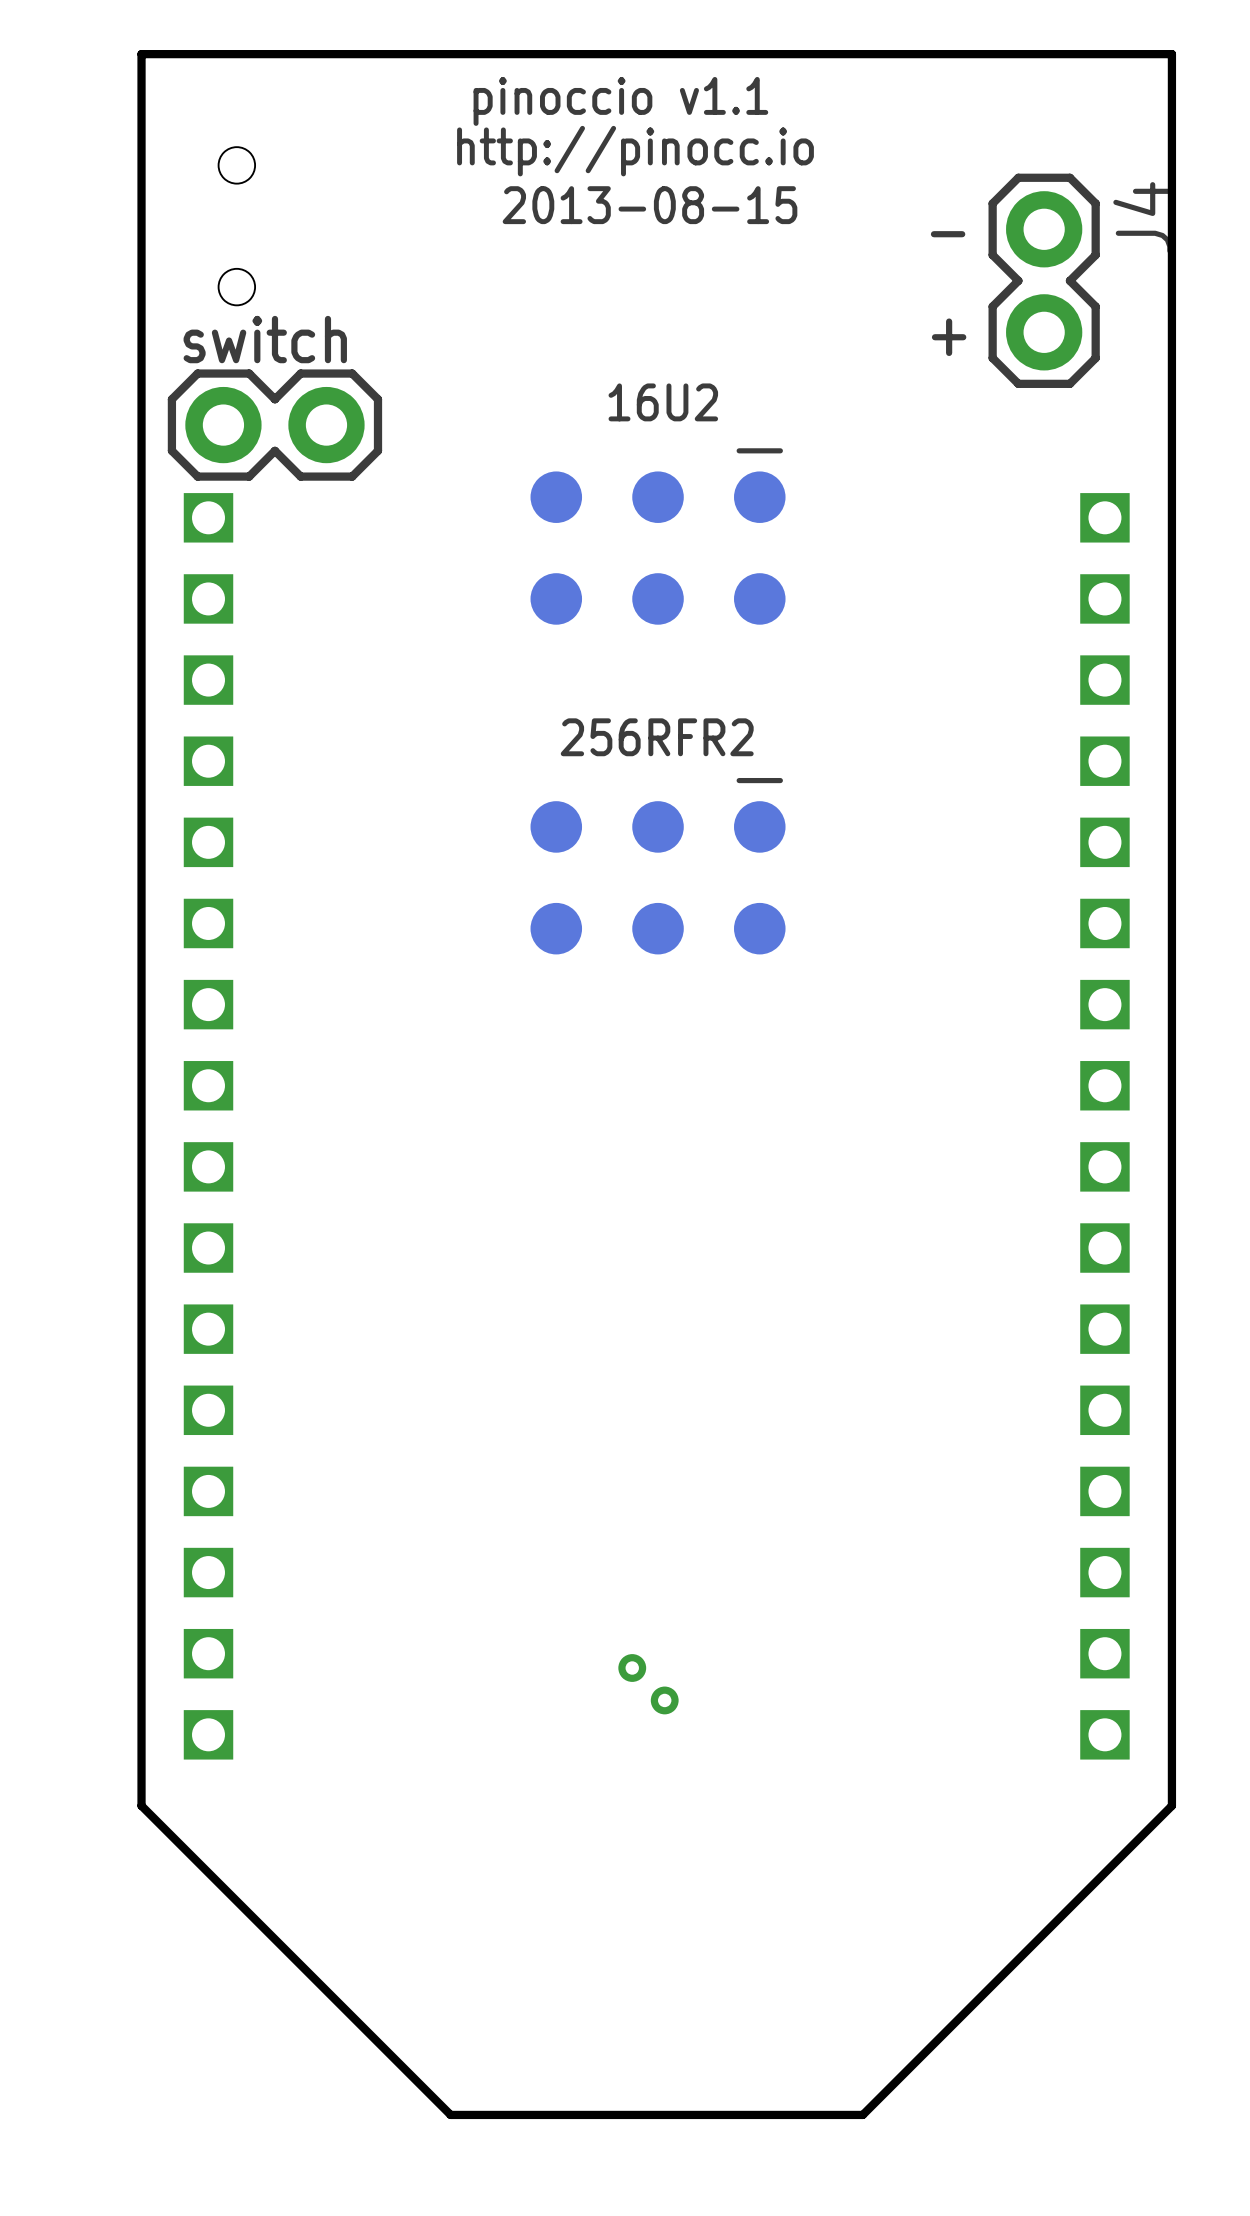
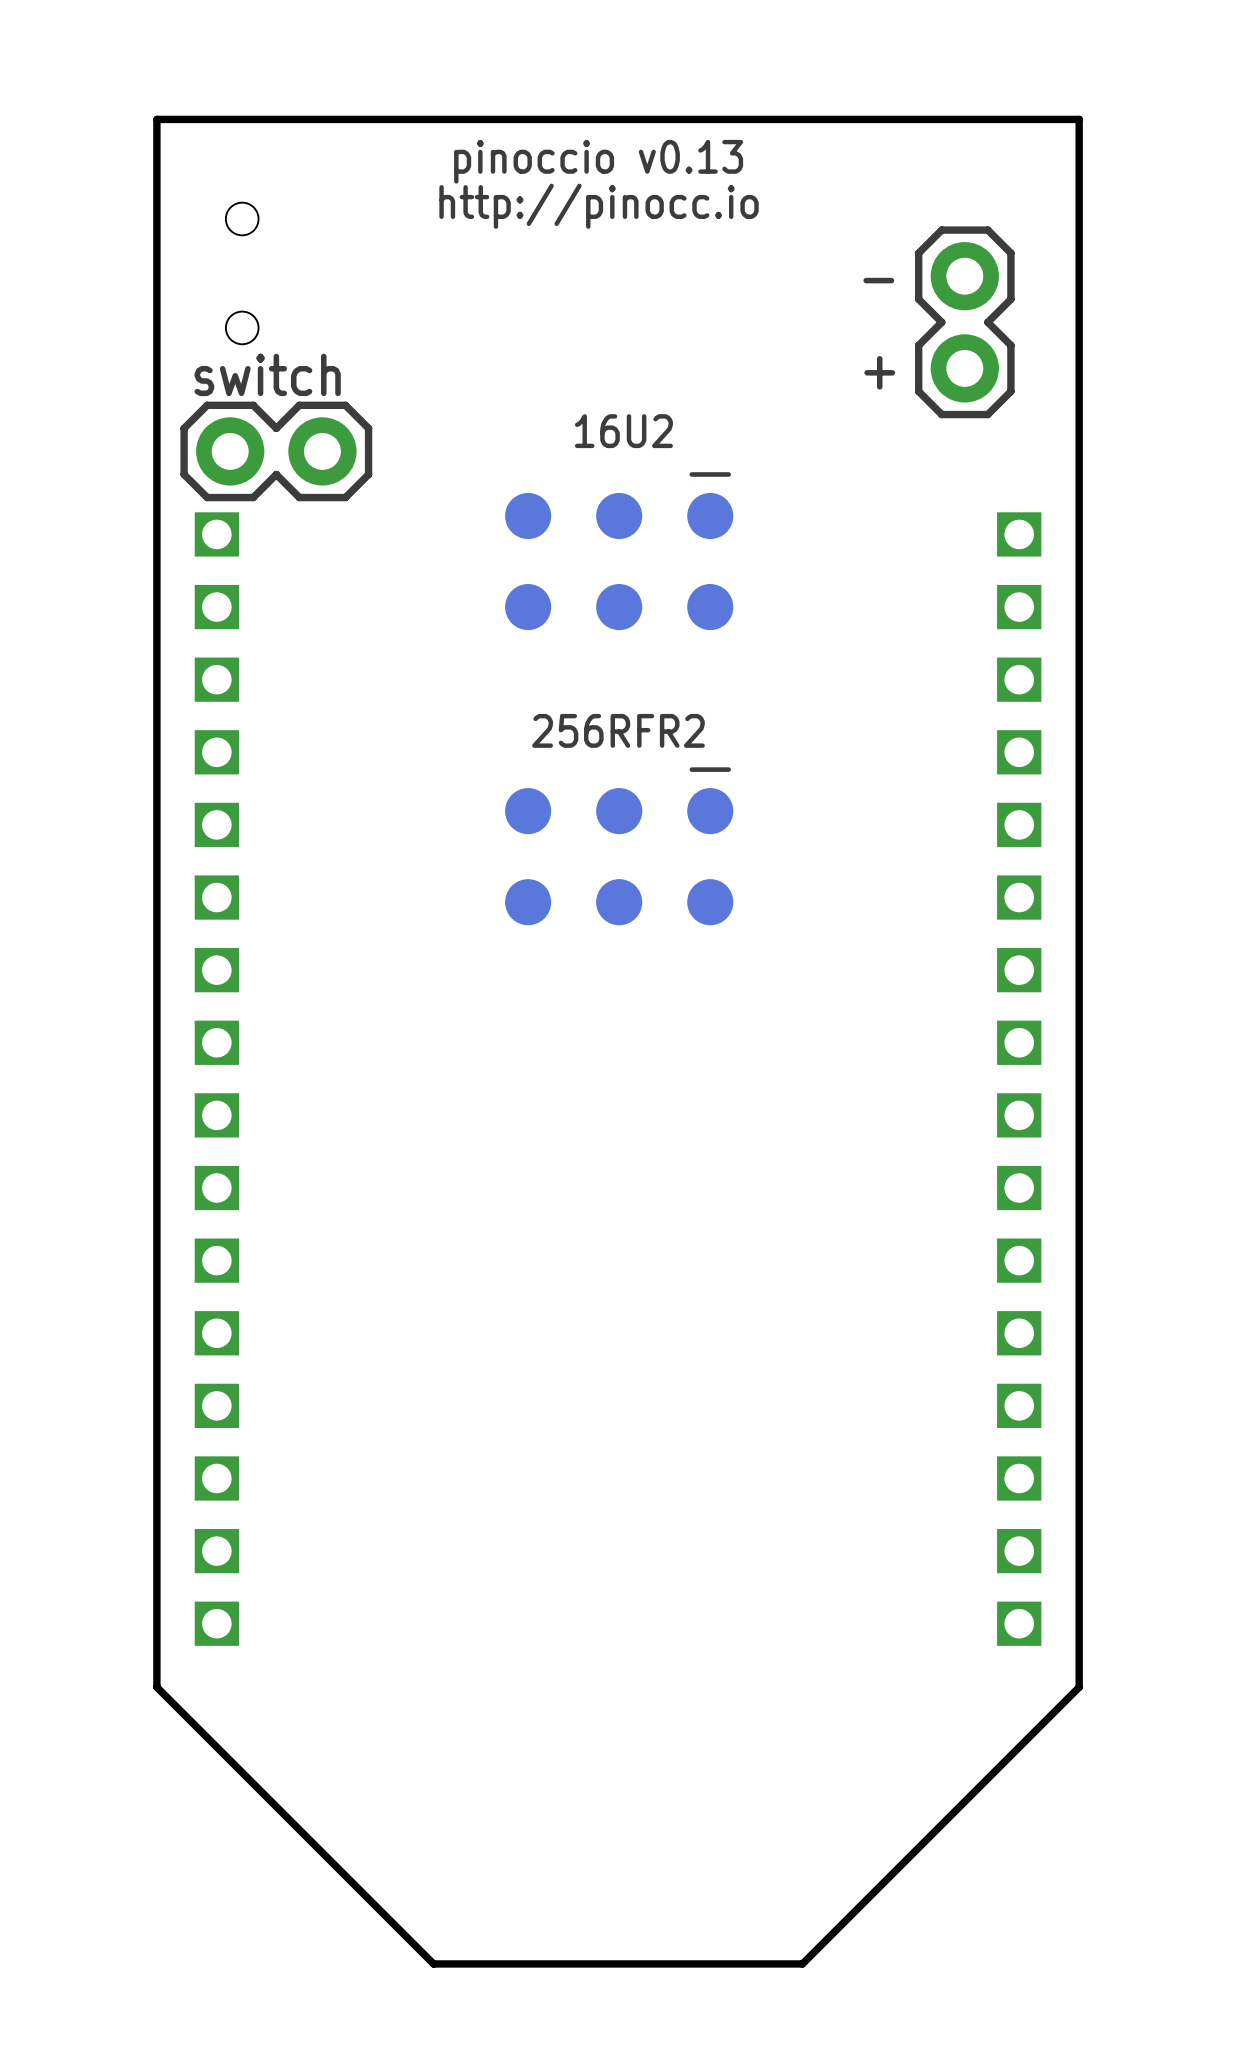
text: pinoccio v1.1 (620, 101) -> pinoccio v0.13 (598, 161)
text: 2013-08-15 (650, 205) -> none
J4 name: J4 (1142, 217) -> none
part: (648, 1684) -> none

